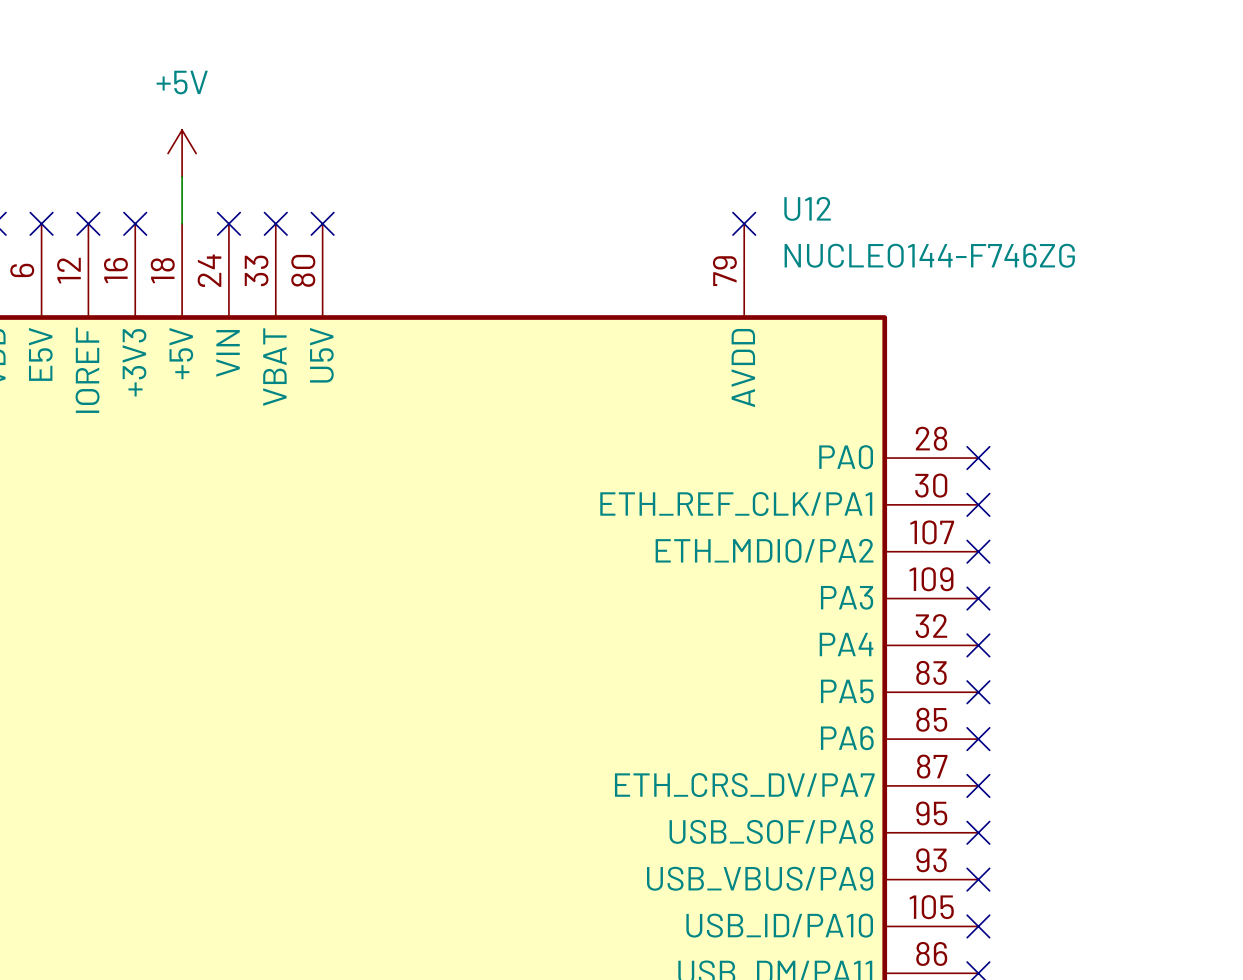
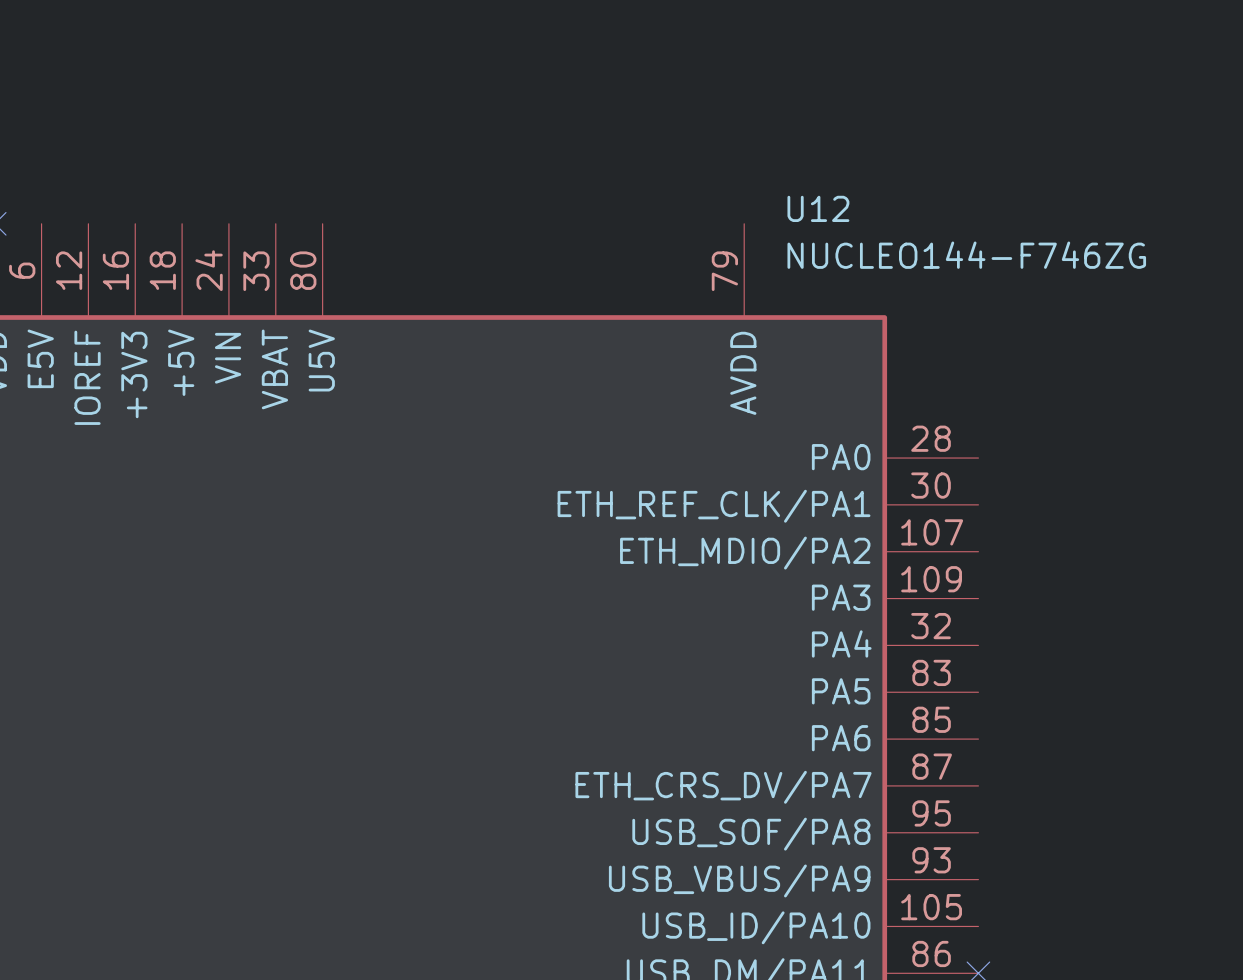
power symbol: +5V (182, 153) -> none
wire: (182, 176) (182, 223) -> none
no-connect mark: (41, 223) -> none
no-connect mark: (88, 223) -> none
no-connect mark: (135, 223) -> none
no-connect mark: (228, 223) -> none
no-connect mark: (275, 223) -> none
no-connect mark: (322, 223) -> none
no-connect mark: (744, 223) -> none
no-connect mark: (978, 458) -> none
no-connect mark: (978, 504) -> none
no-connect mark: (978, 551) -> none
no-connect mark: (978, 598) -> none
no-connect mark: (978, 645) -> none
no-connect mark: (978, 692) -> none
no-connect mark: (978, 739) -> none
no-connect mark: (978, 785) -> none
no-connect mark: (978, 832) -> none
no-connect mark: (978, 879) -> none
no-connect mark: (978, 926) -> none

